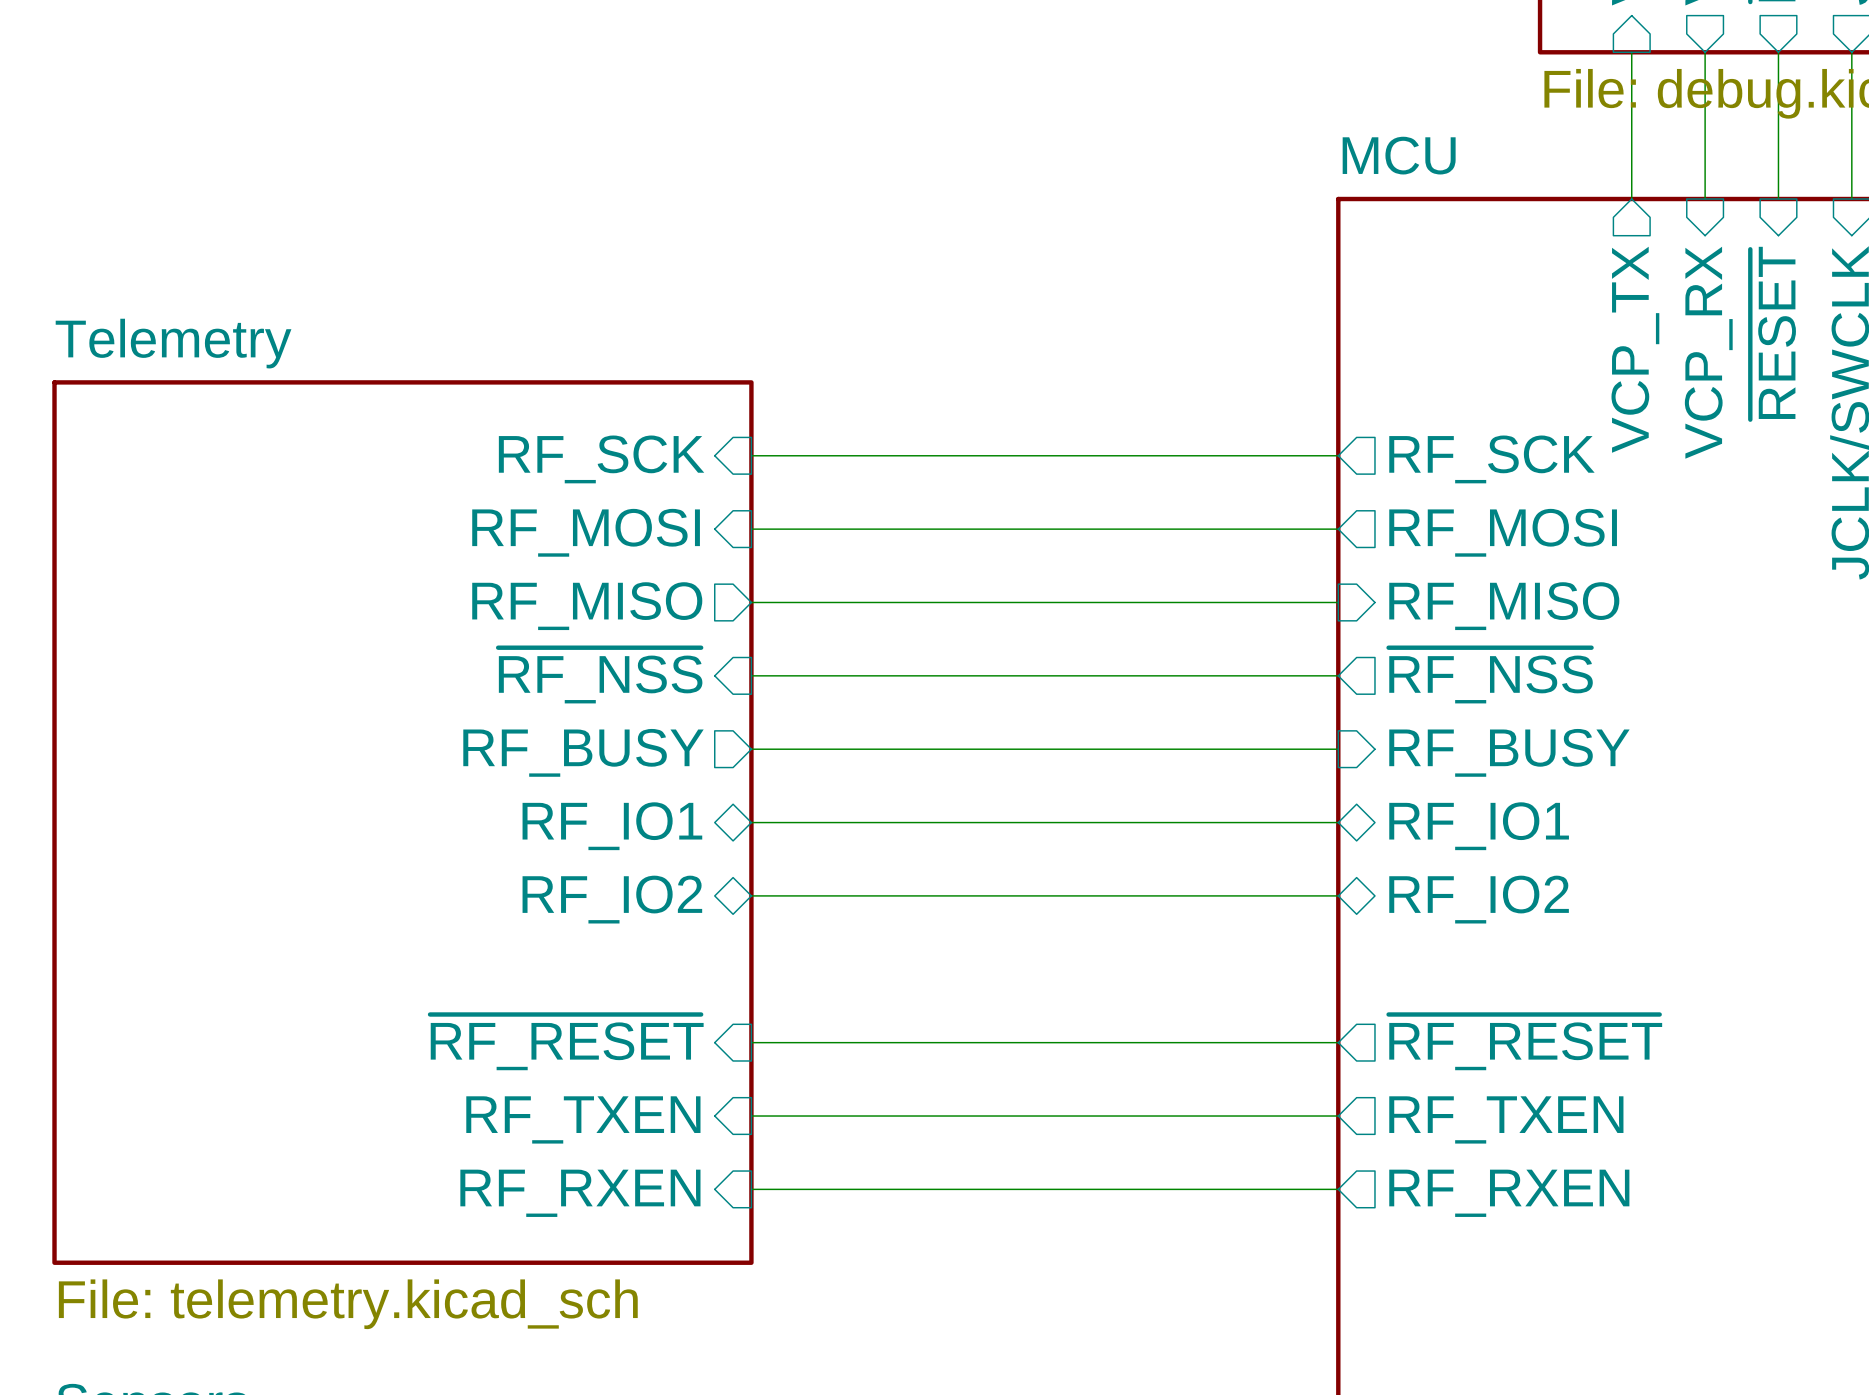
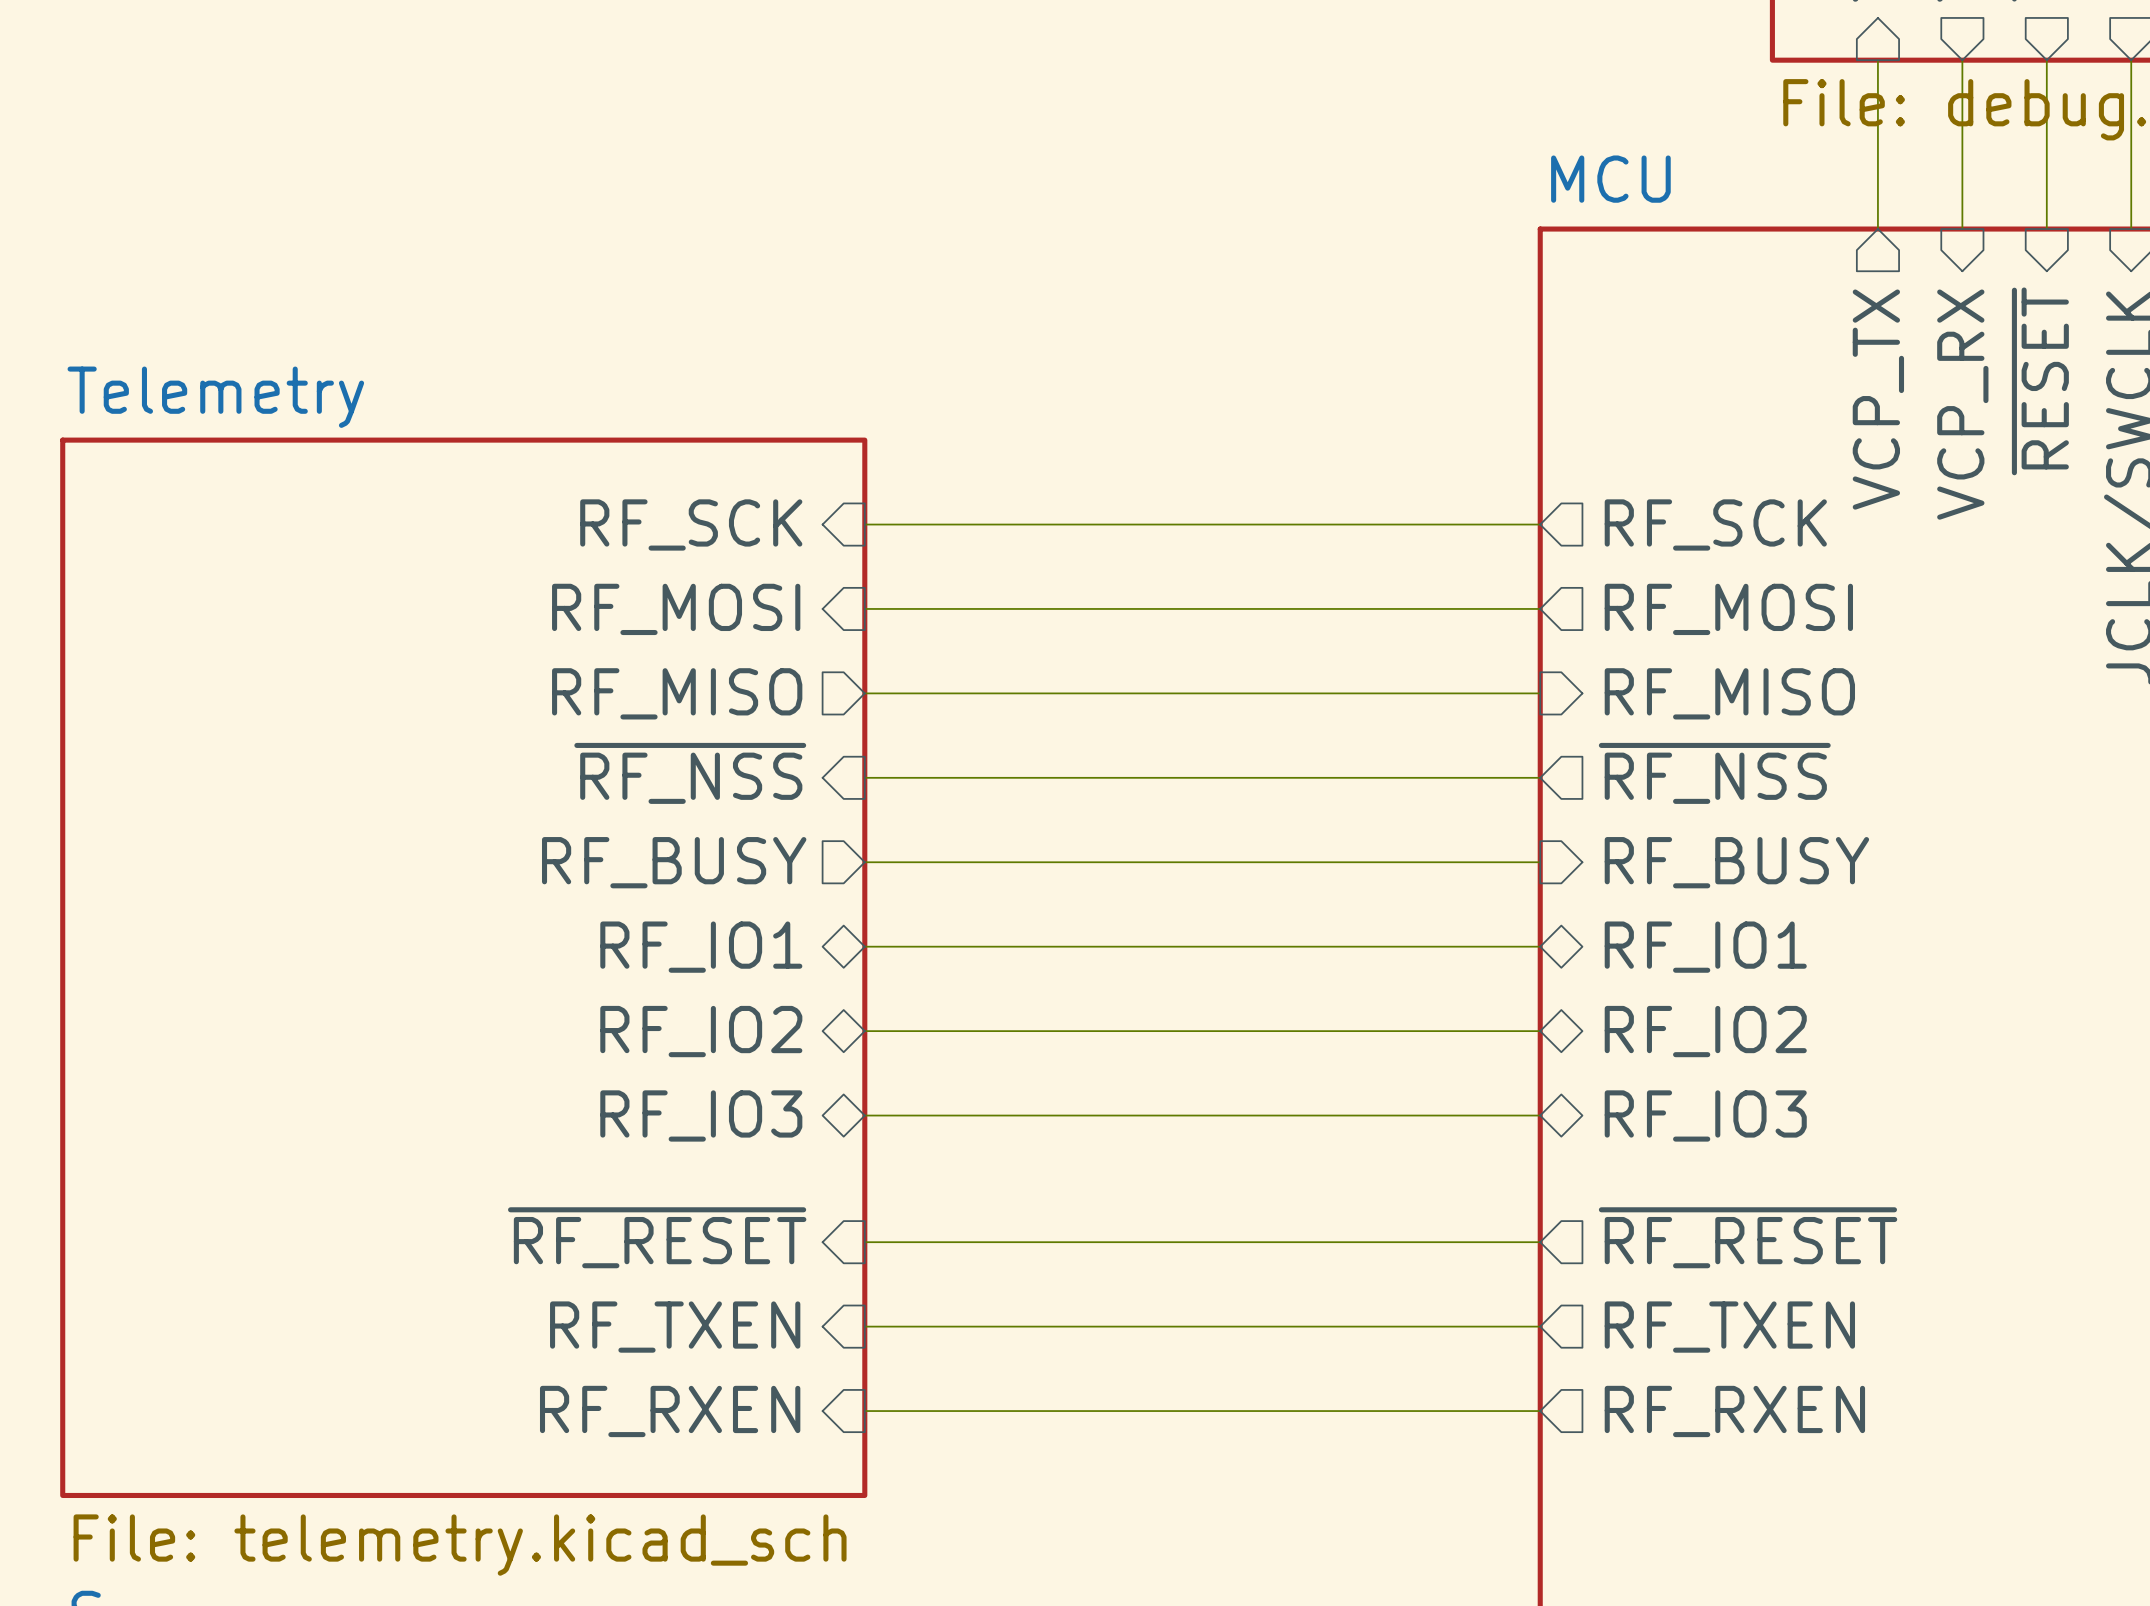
sheet Telemetry shape: [52, 380, 754, 1265] -> [60, 437, 868, 1499]
wire: none -> (864, 1115) (1540, 1115)
sheet pin: none -> RF_IO3 (701, 1115)
sheet pin: none -> RF_IO3 (1705, 1115)
sheet pin position: ~{RF_RESET} (566, 1042) -> ~{RF_RESET} (657, 1237)
wire: (751, 1042) (1338, 1042) -> (864, 1242) (1540, 1242)
sheet pin position: ~{RF_RESET} (1525, 1042) -> ~{RF_RESET} (1748, 1237)
wire: (751, 1116) (1338, 1116) -> (864, 1326) (1540, 1326)
sheet pin position: RF_TXEN (583, 1119) -> RF_TXEN (675, 1327)
sheet pin position: RF_TXEN (1506, 1119) -> RF_TXEN (1729, 1327)
wire: (751, 1189) (1338, 1189) -> (864, 1411) (1540, 1411)
sheet pin position: RF_RXEN (580, 1193) -> RF_RXEN (670, 1411)
sheet pin position: RF_RXEN (1509, 1193) -> RF_RXEN (1734, 1411)

